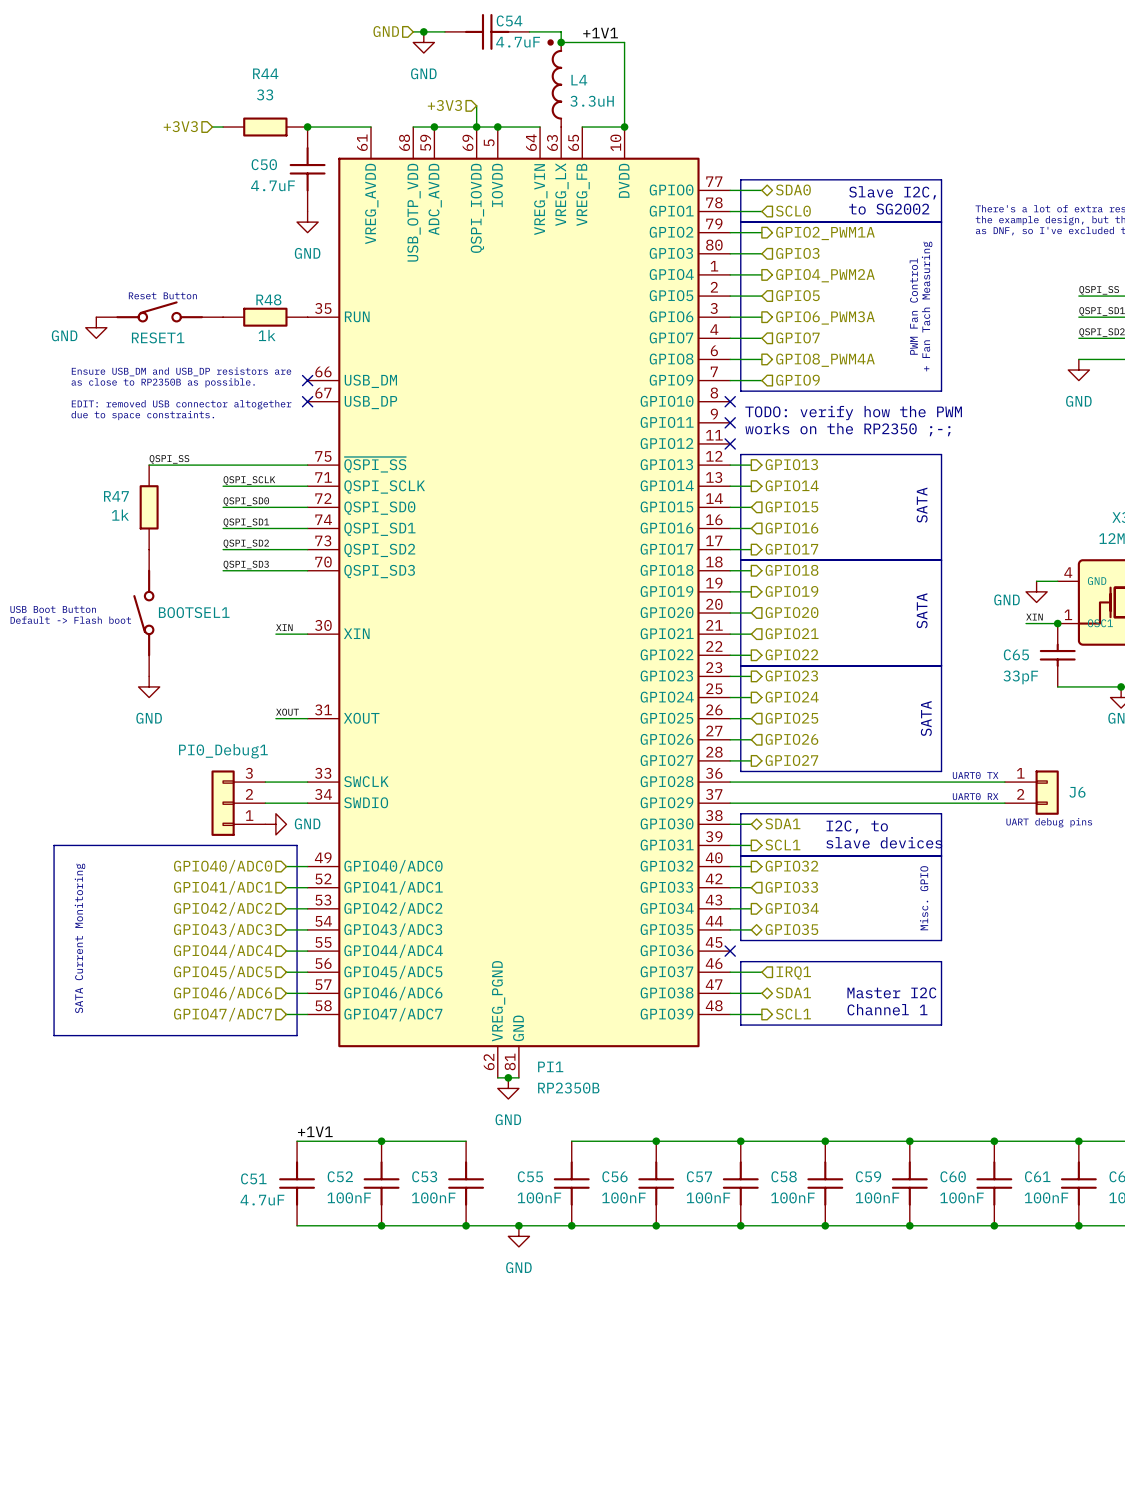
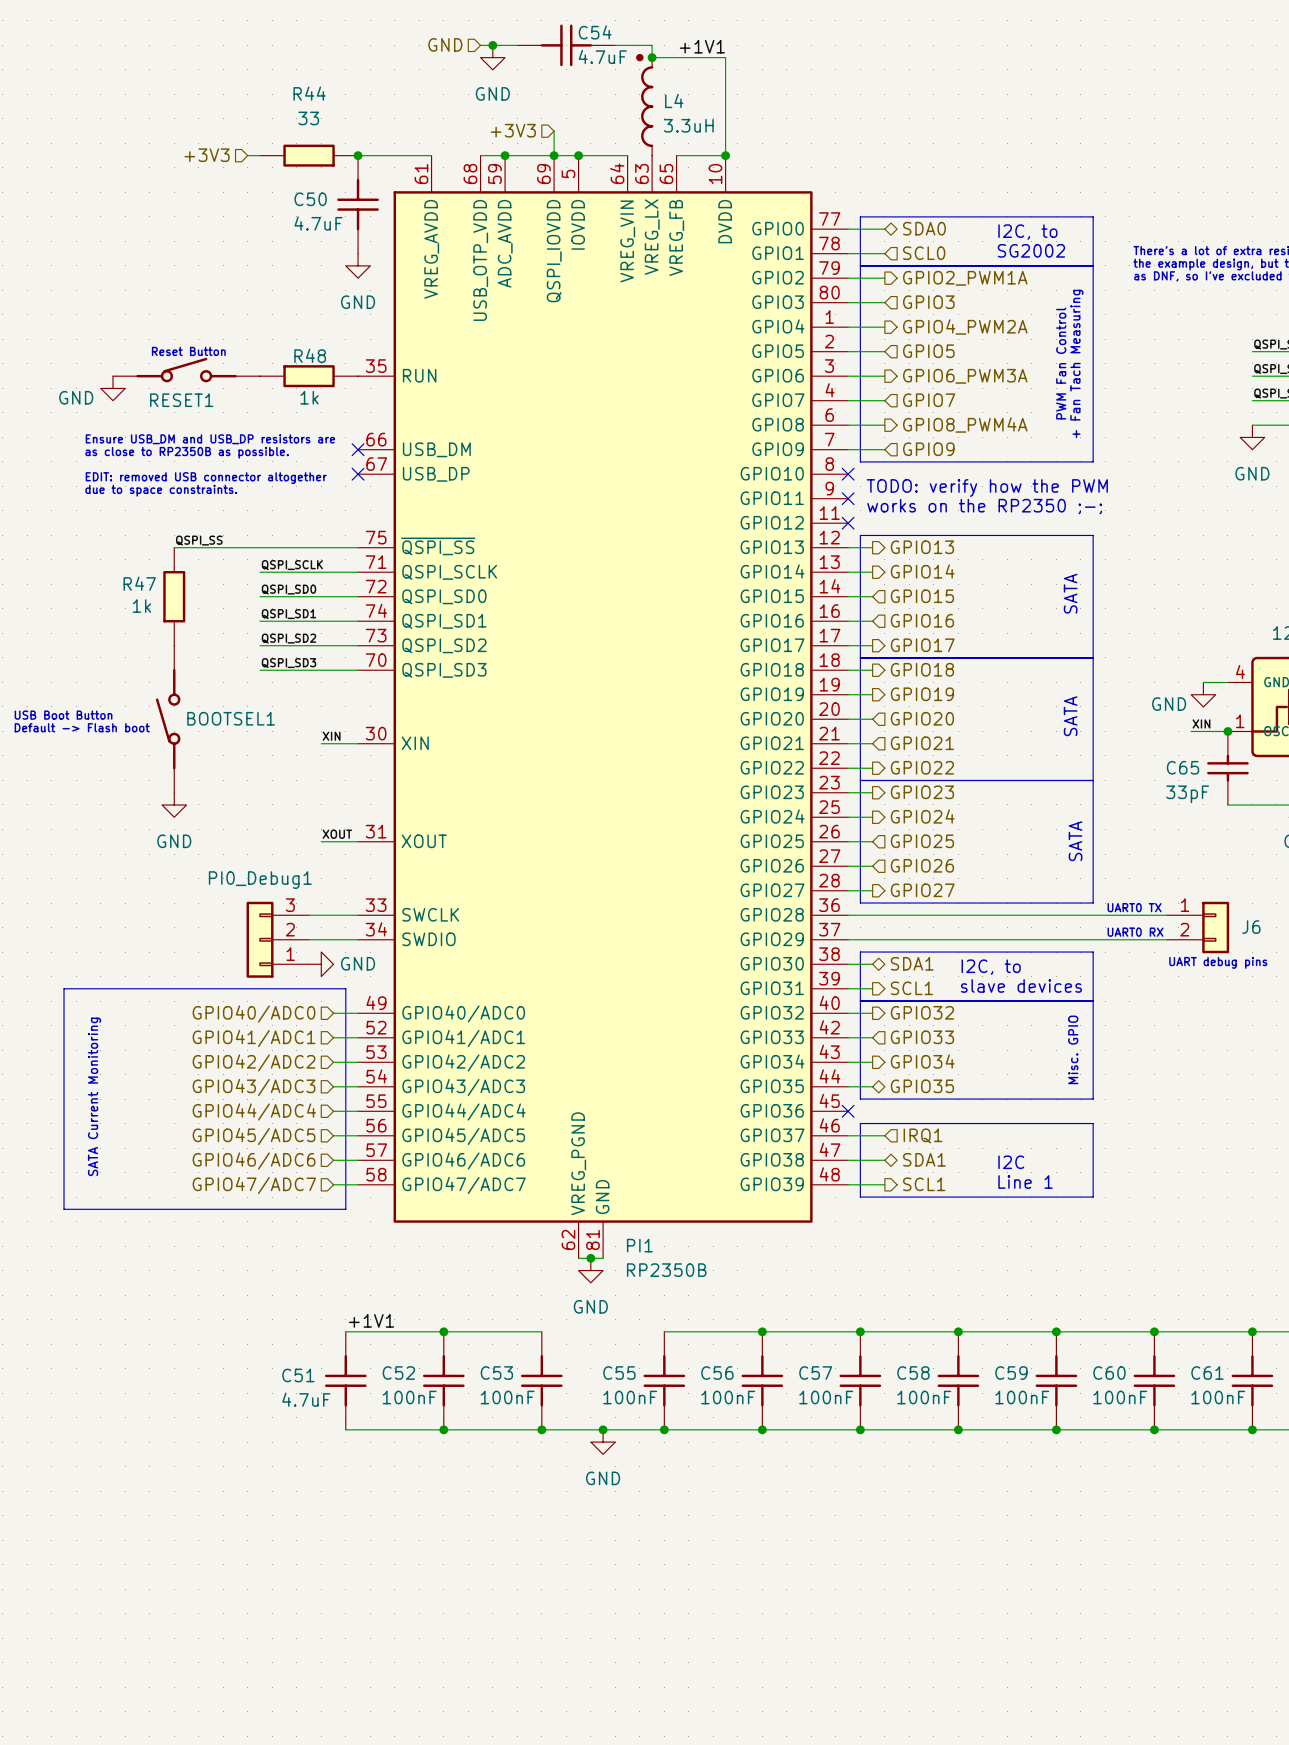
text: Slave I2C, (892, 192) -> none
text: none -> I2C, to (1027, 232)
text: to SG2002 (889, 209) -> SG2002 (1031, 250)
text: Master I2C (891, 992) -> none
text: none -> I2C (1011, 1162)
text: Channel 1 (887, 1009) -> none
text: none -> Line 1 (1025, 1181)

